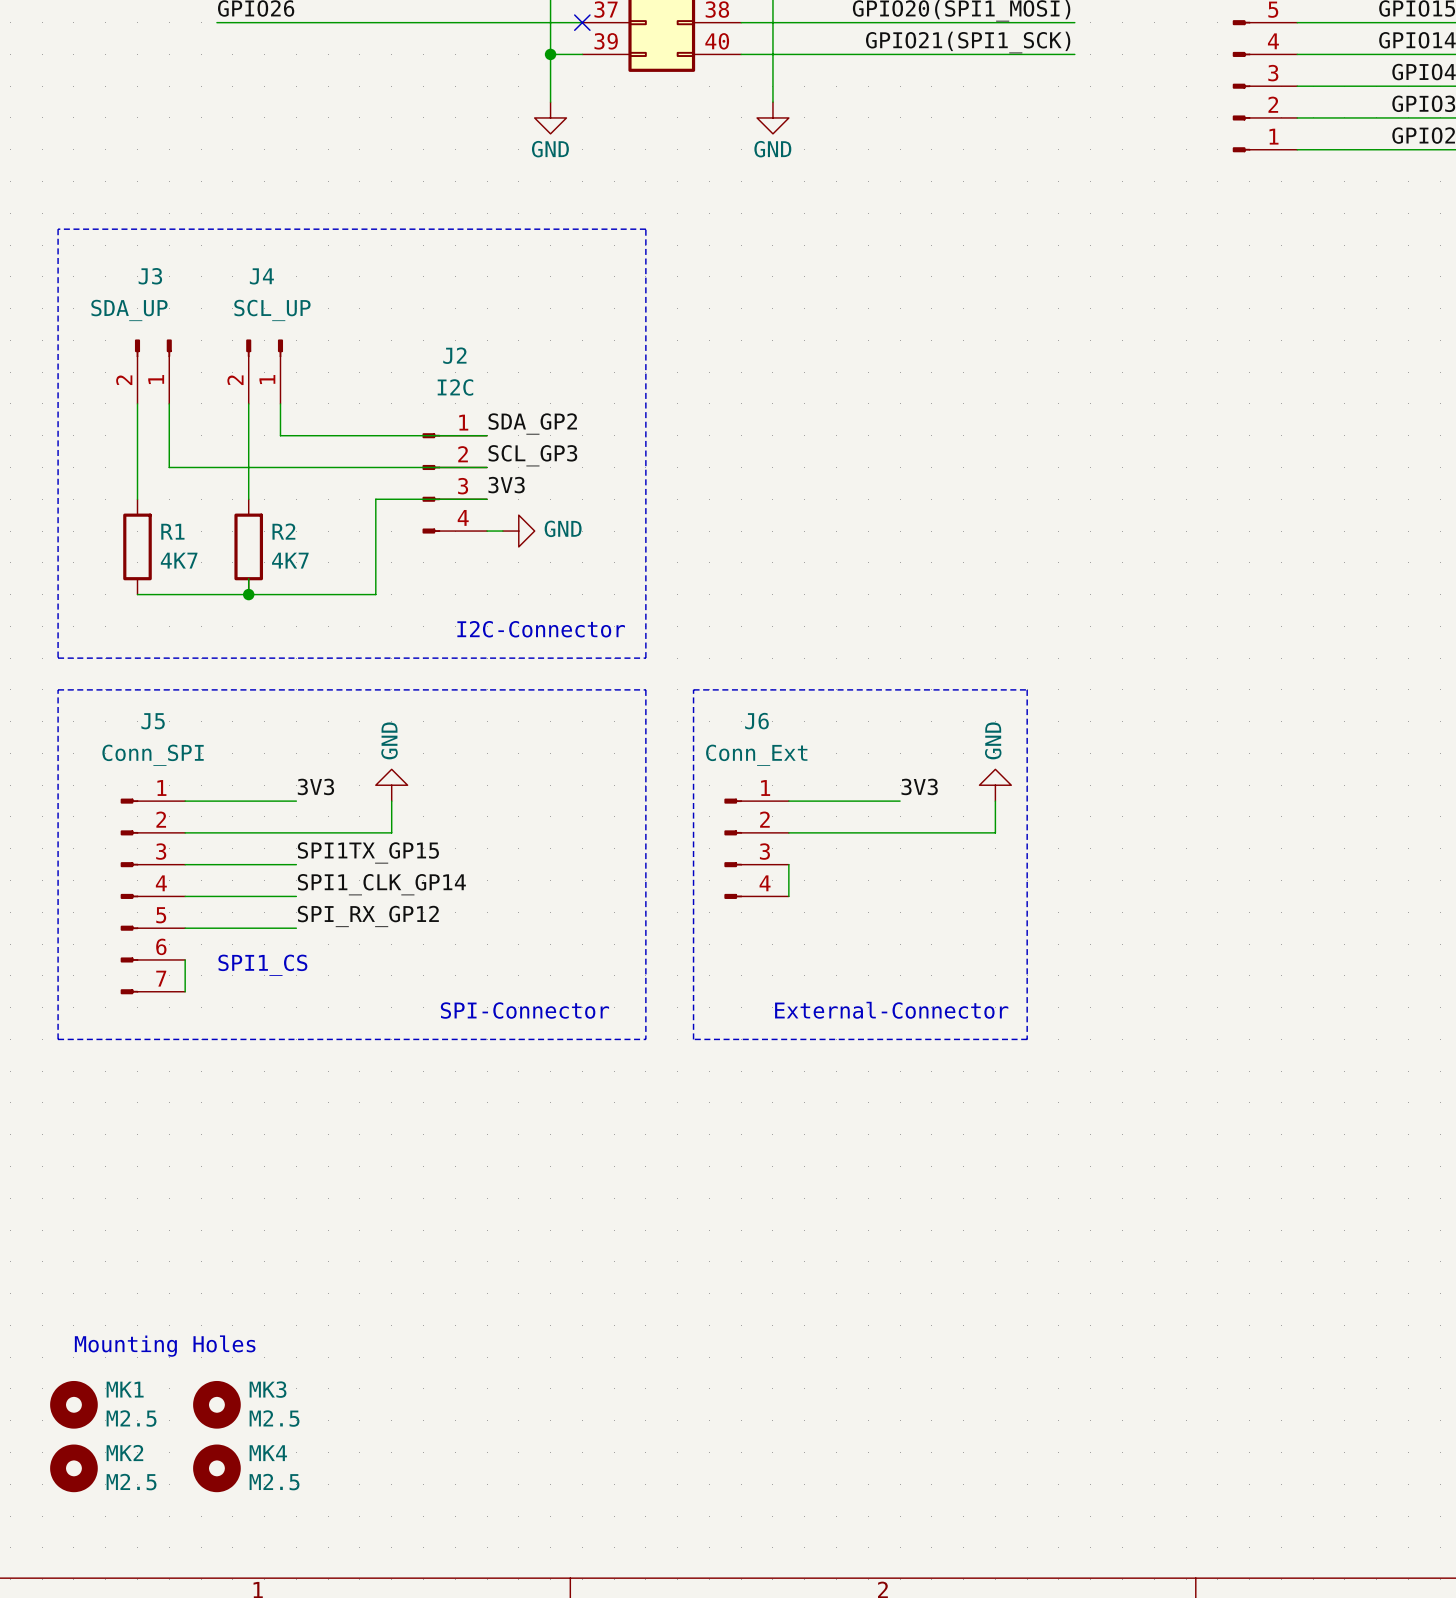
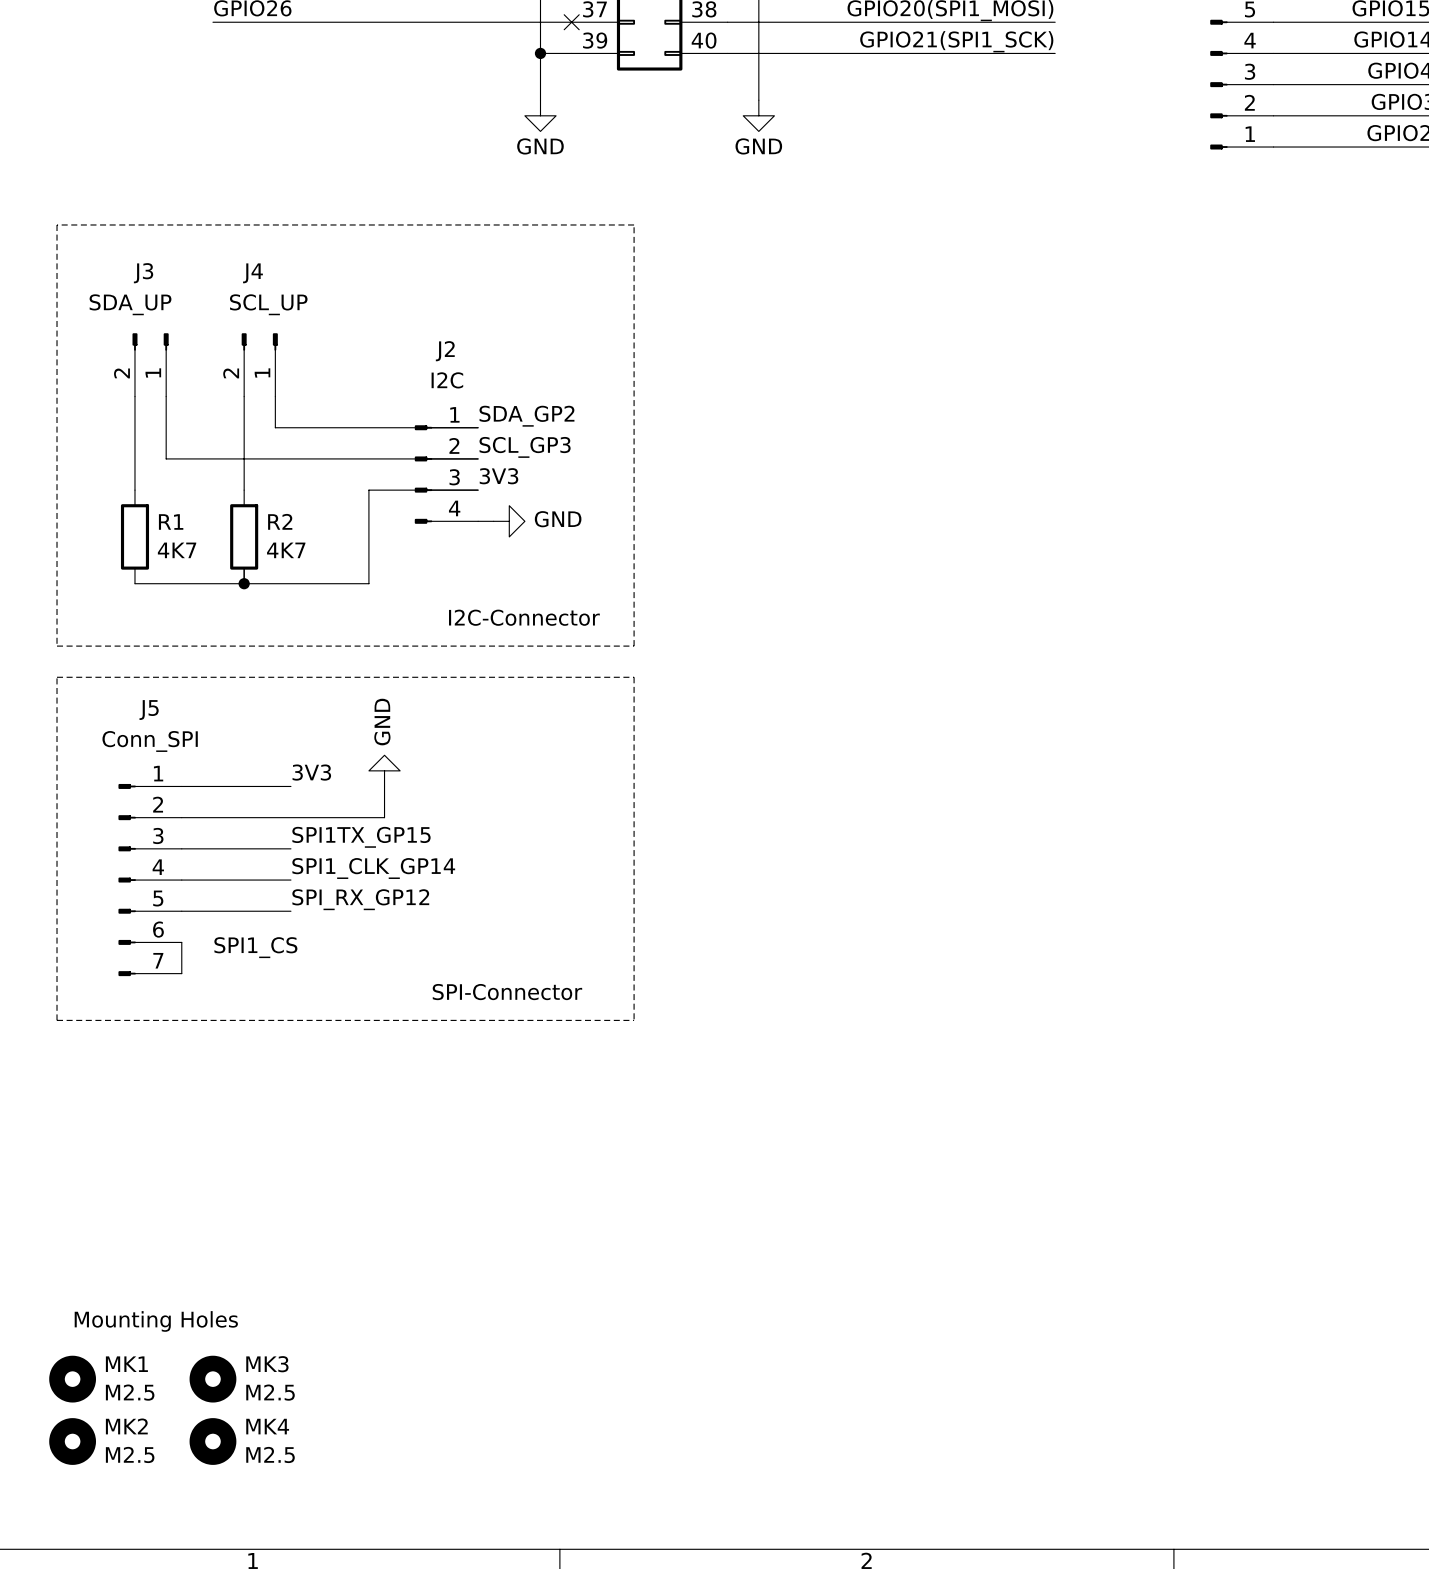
line: (693, 689) (1027, 689) (1027, 1039) (693, 1039) (693, 689) -> none
power symbol: GND (995, 785) -> none
label: 3V3 (919, 786) -> none
wire: (788, 801) (900, 801) -> none
wire: (995, 801) (995, 832) (788, 832) -> none
J6: Conn_Ext (756, 848) -> none
wire: (788, 864) (788, 896) -> none
text: External-Connector (891, 1010) -> none

